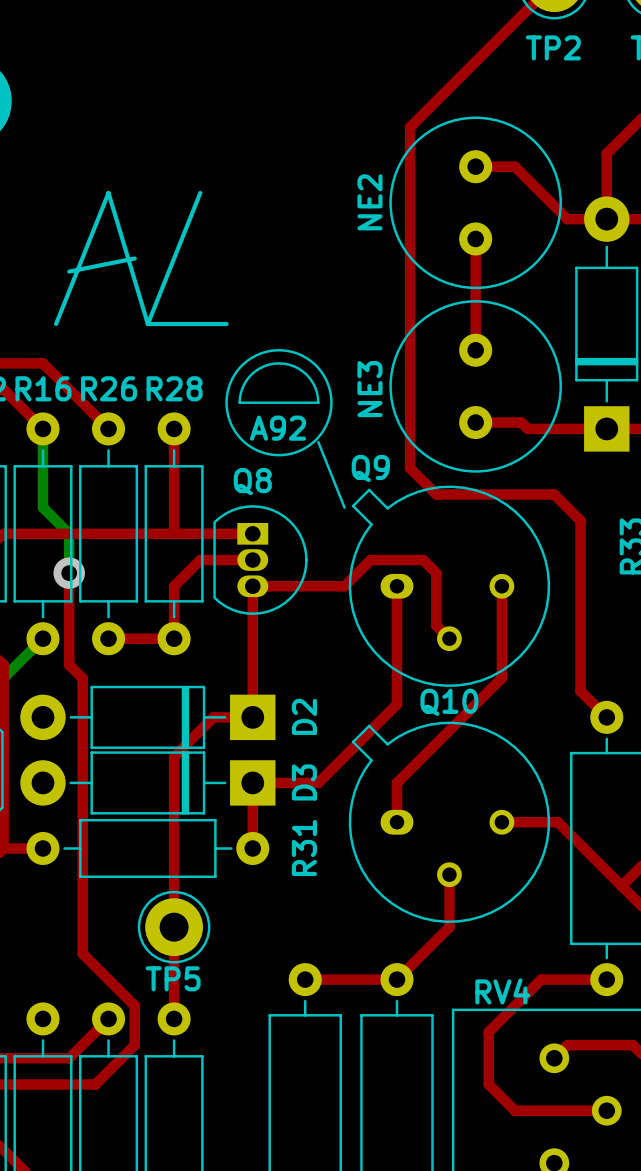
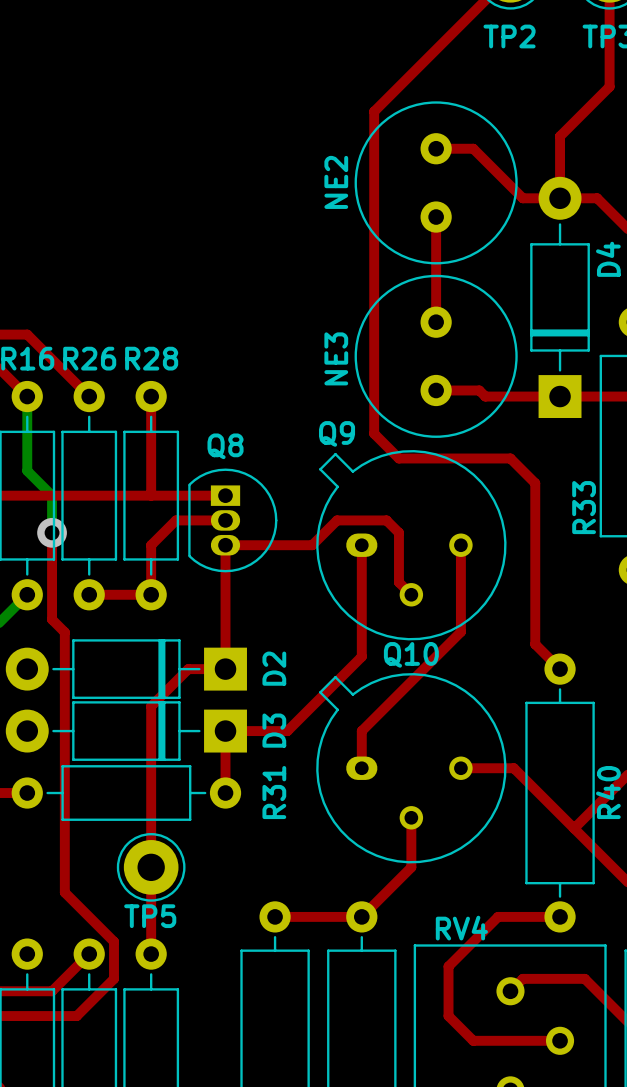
line: (200, 192) (147, 324) -> none
line: (134, 258) (69, 271) -> none
line: (56, 324) (108, 192) (147, 324) -> none
line: (147, 324) (226, 324) -> none
drawing: [225, 349, 333, 457] -> none
line: (239, 402) (318, 402) (315, 387) (306, 374) (294, 366) (278, 363) (263, 366) (251, 374) (242, 387) (239, 402) -> none
text: A92 (277, 428) -> none
line: (318, 442) (344, 507) -> none

